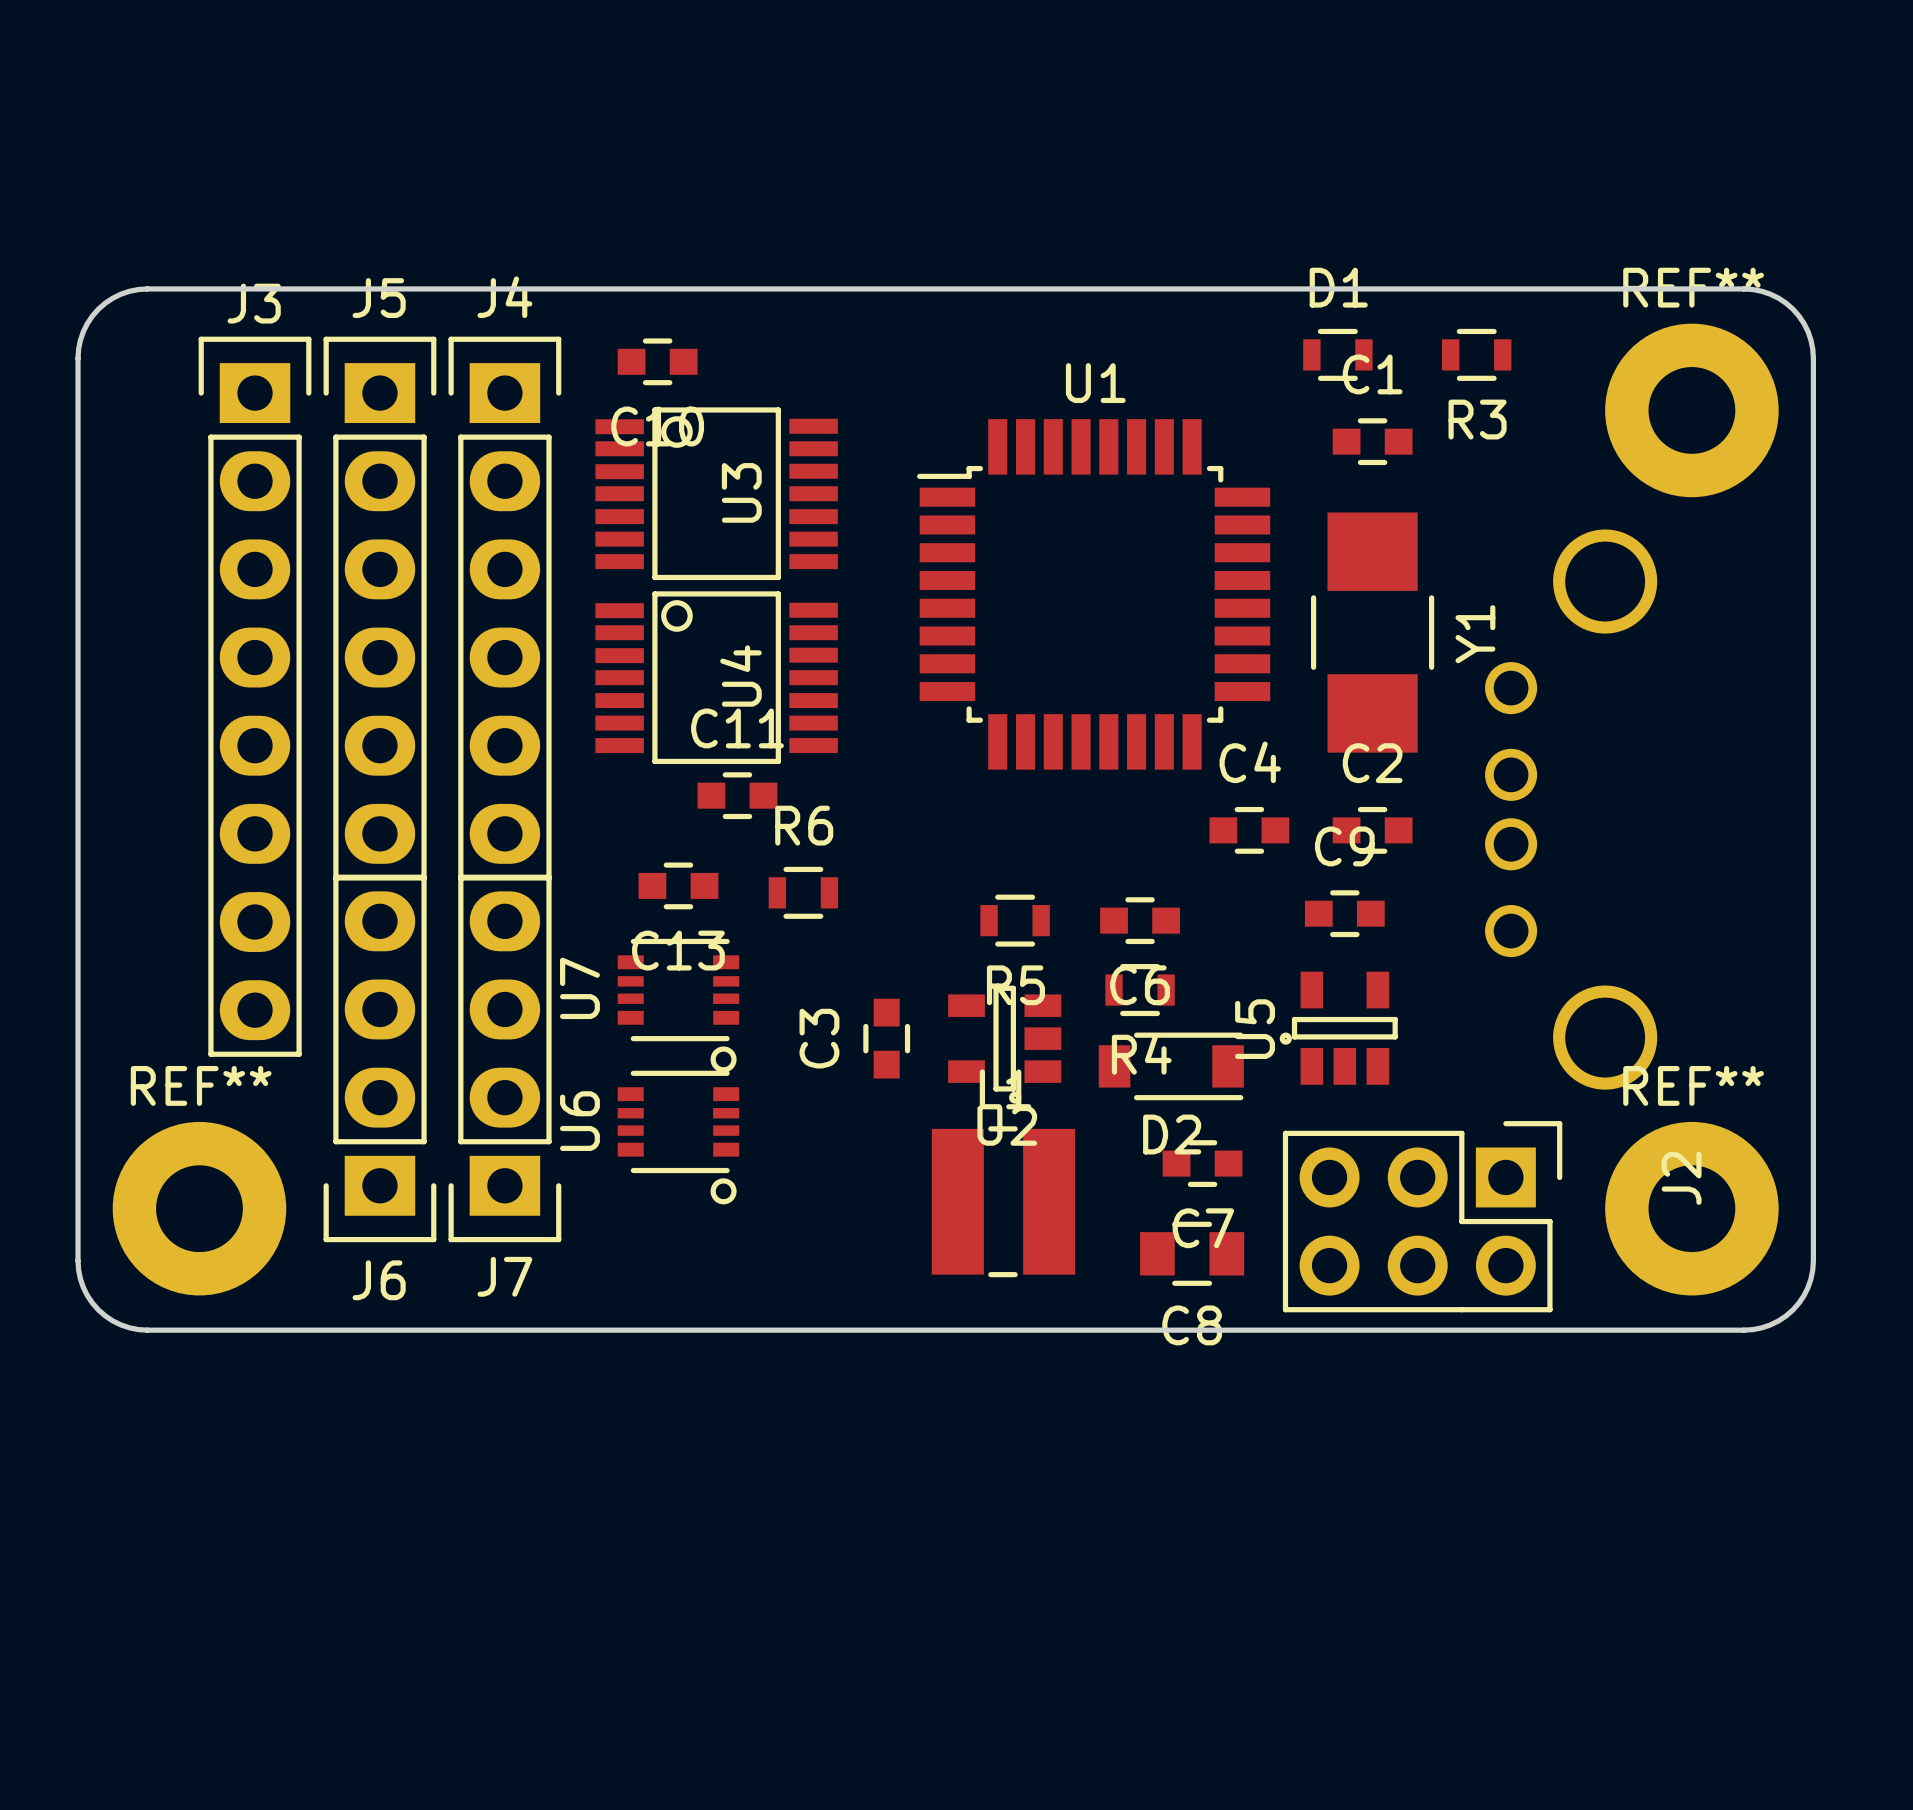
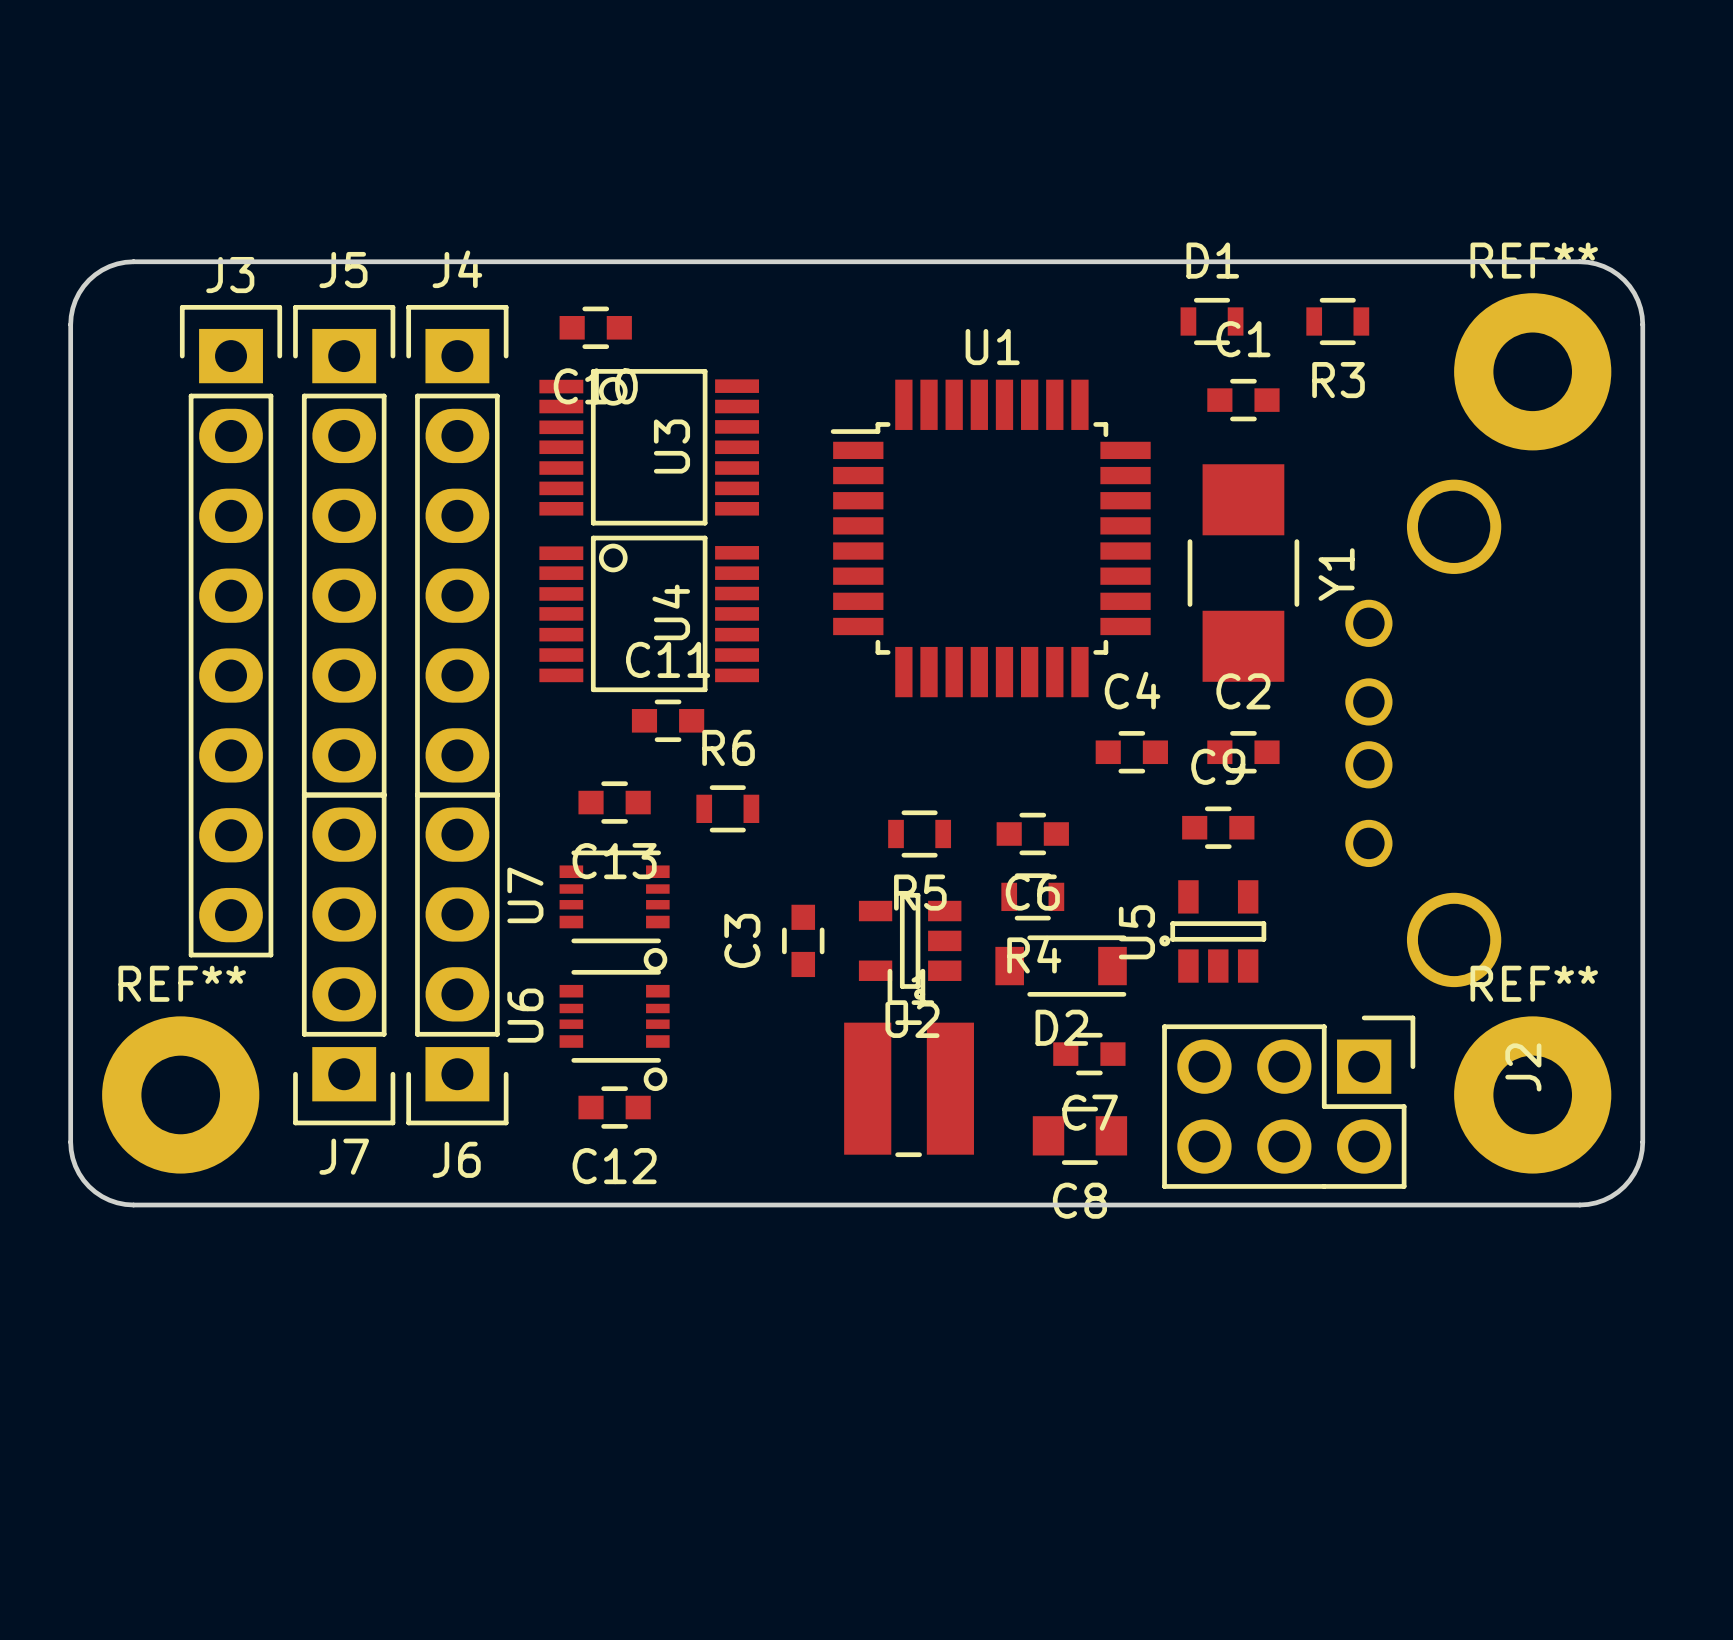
C12: none -> (614, 1107)
J7 name: J7 (504, 1276) -> J6 (456, 1159)
J6 name: J6 (379, 1280) -> J7 (344, 1156)

